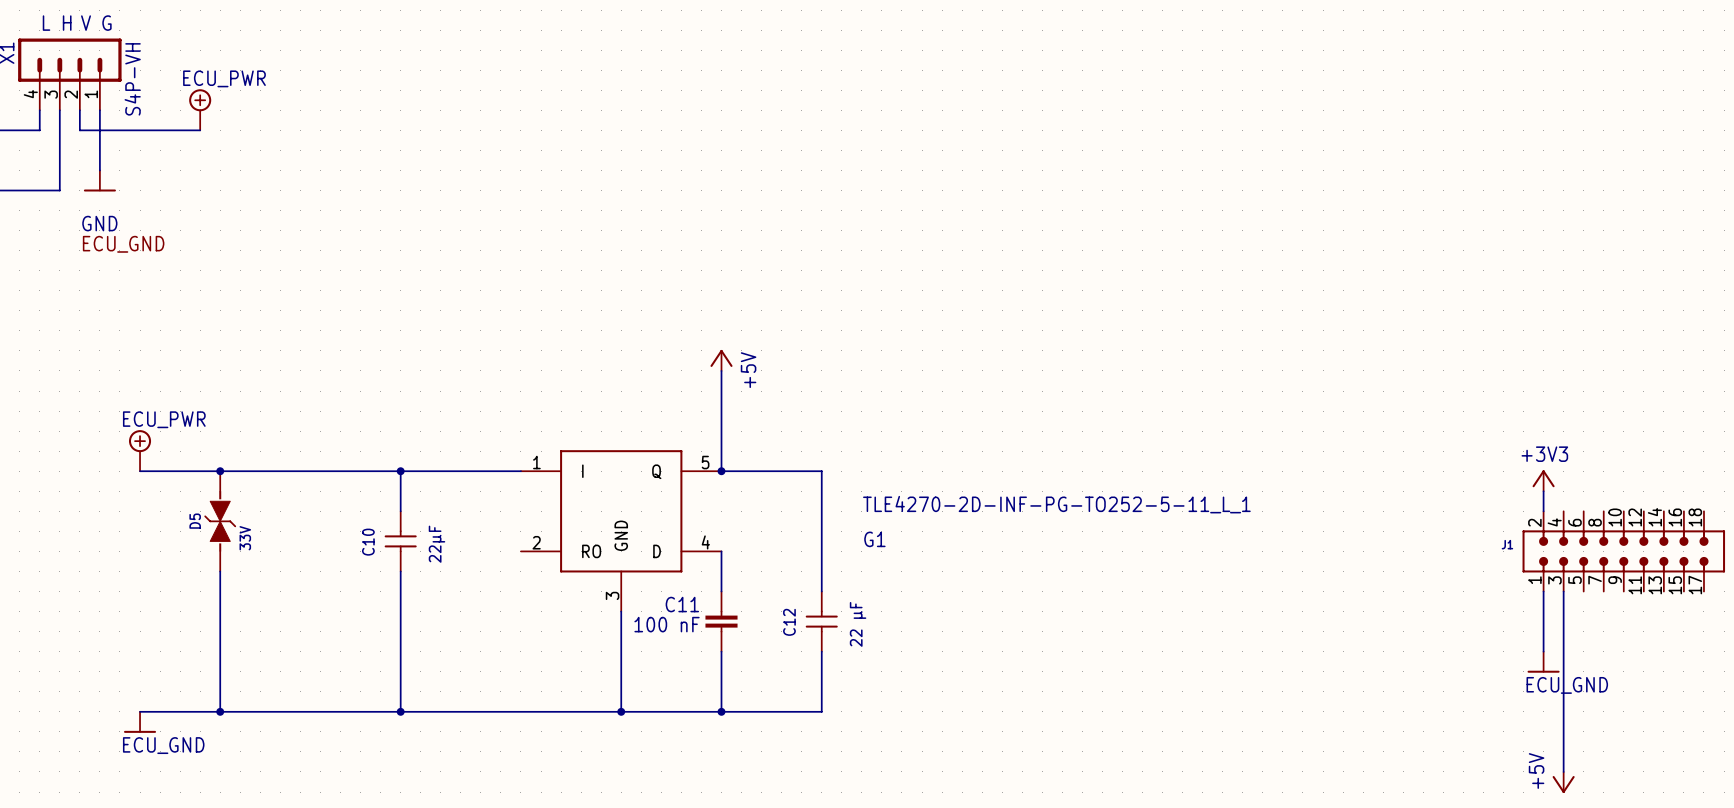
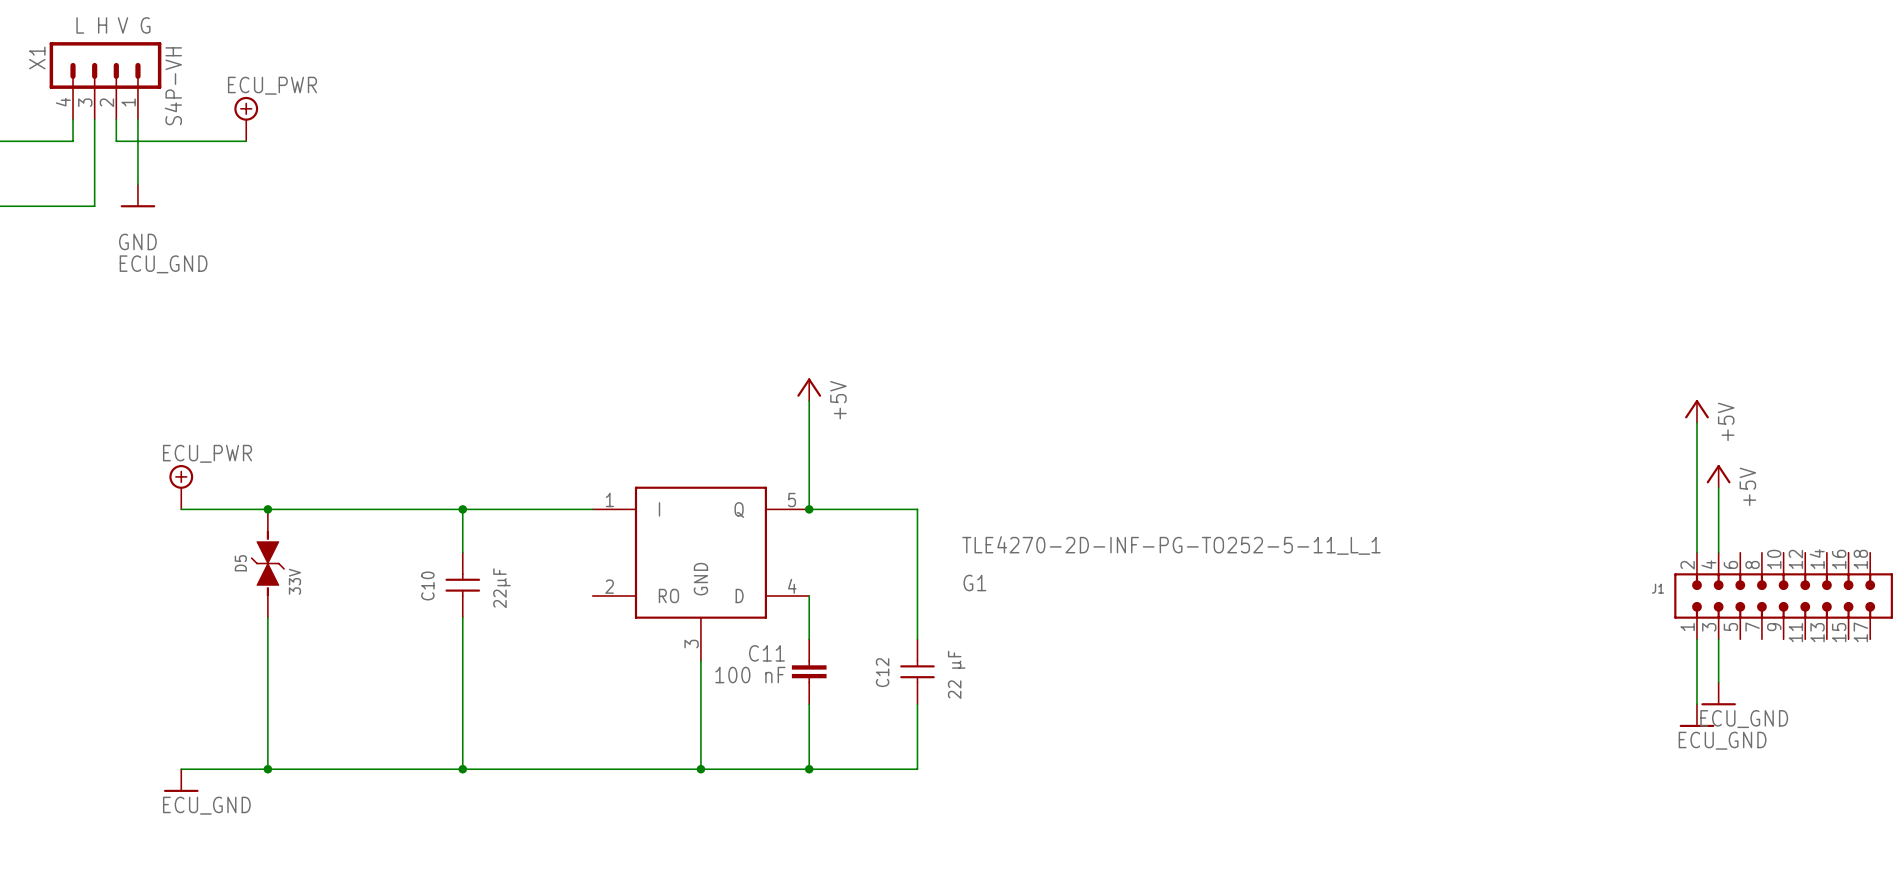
power symbol: none -> +5V (1696, 411)
wire: none -> (1696, 422) (1696, 531)
power symbol: none -> +5V (1718, 476)
wire: none -> (1718, 487) (1718, 552)
power symbol: +3V3 (1543, 480) -> none
wire: (1563, 631) (1563, 771) -> none
power symbol: none -> ECU_GND (1718, 693)
power symbol: +5V (1563, 782) -> none

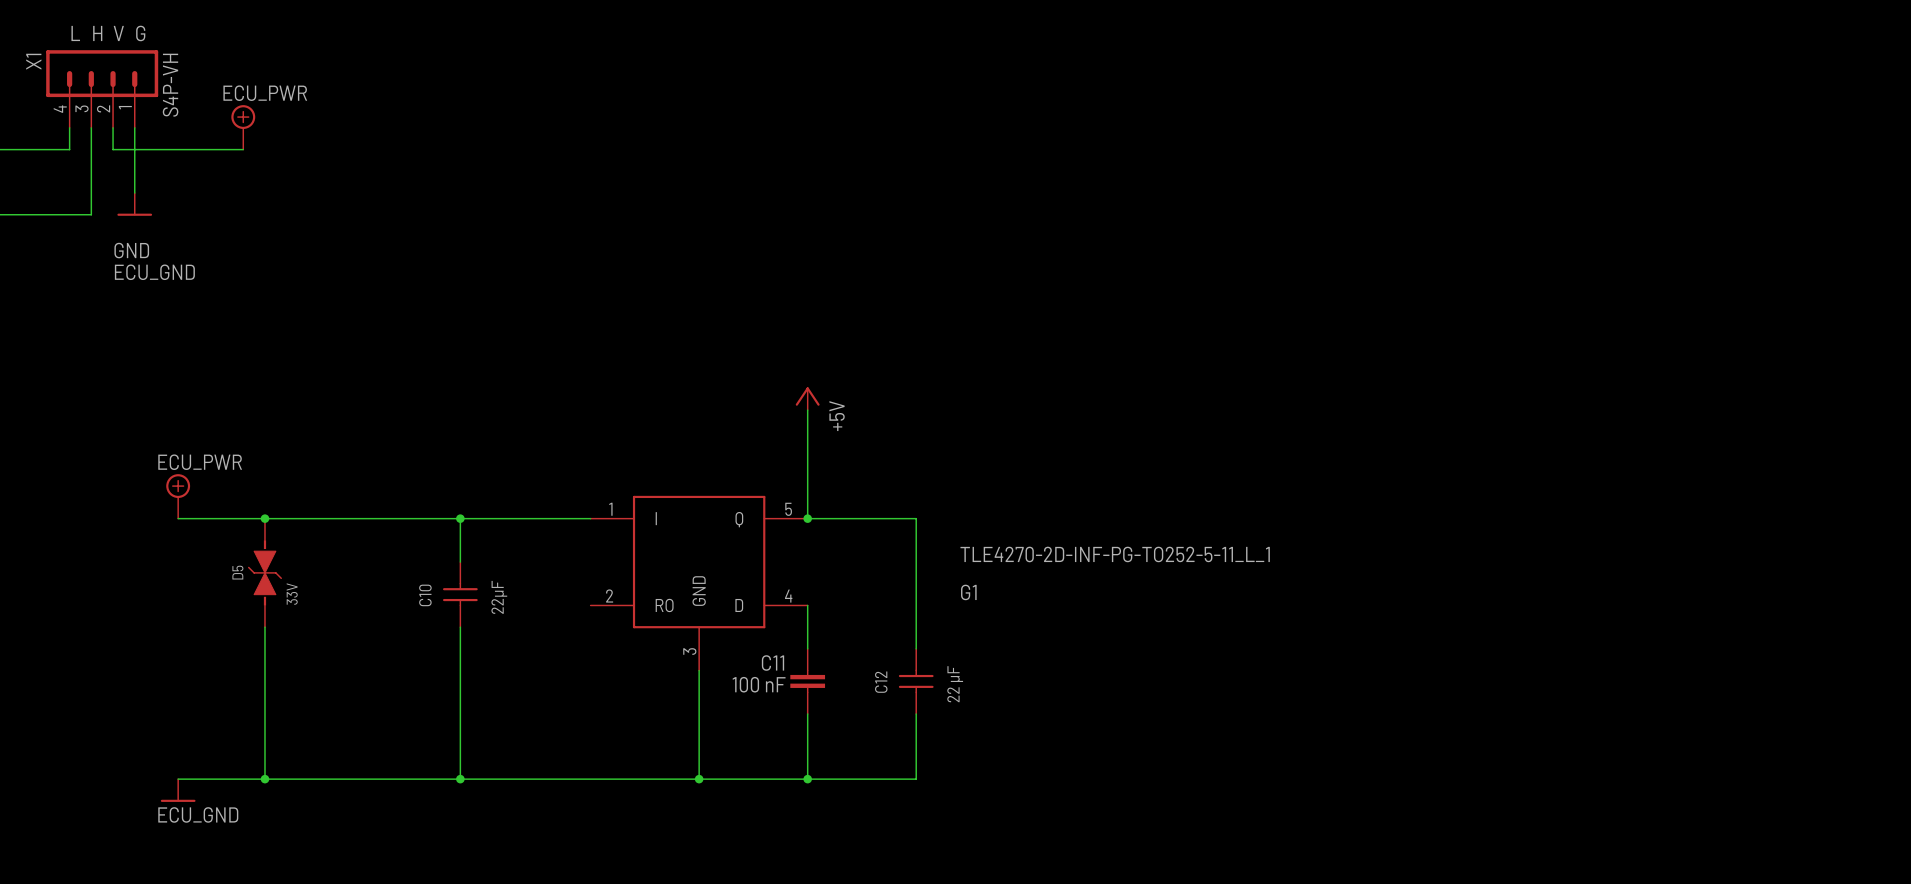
power symbol: +5V (1696, 411) -> none
wire: (1696, 422) (1696, 552) -> none
power symbol: +5V (1718, 476) -> none
wire: (1718, 487) (1718, 552) -> none
J1: (1783, 596) -> none
wire: (1696, 639) (1696, 704) -> none
wire: (1718, 639) (1718, 682) -> none
power symbol: ECU_GND (1718, 693) -> none
power symbol: ECU_GND (1696, 715) -> none

